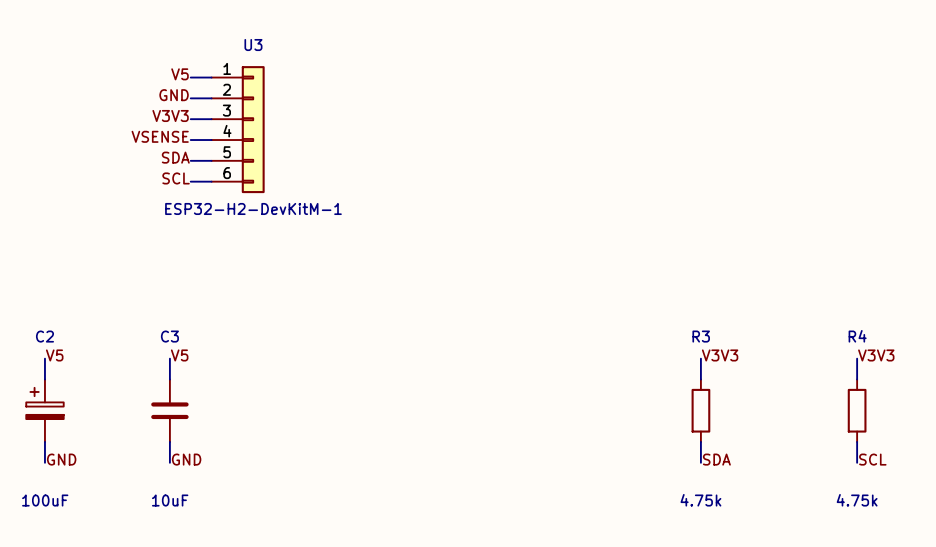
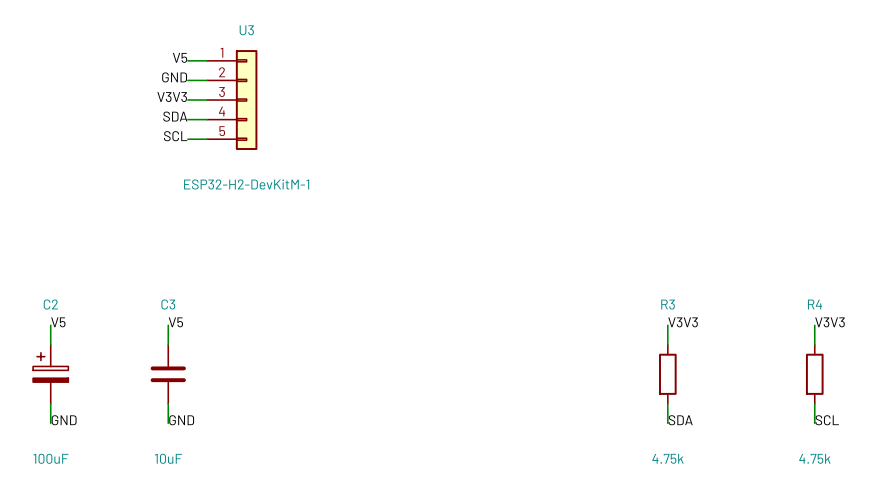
U3 symbol: [211, 66, 265, 194] -> [207, 50, 258, 150]
label: VSENSE (160, 136) -> SDA (175, 116)
label: SDA (175, 157) -> SCL (175, 136)
label: SCL (176, 178) -> none
wire: (190, 181) (211, 181) -> none

